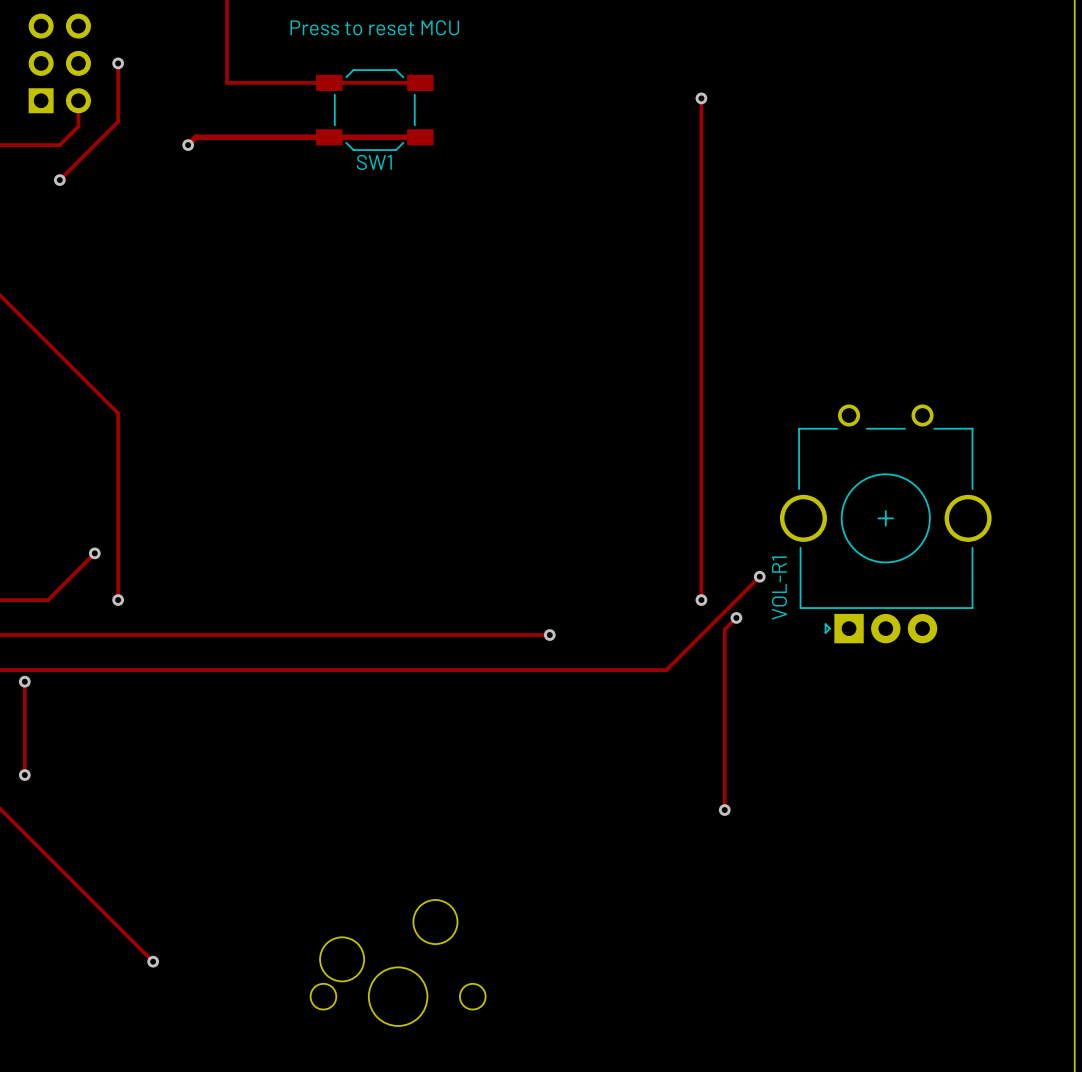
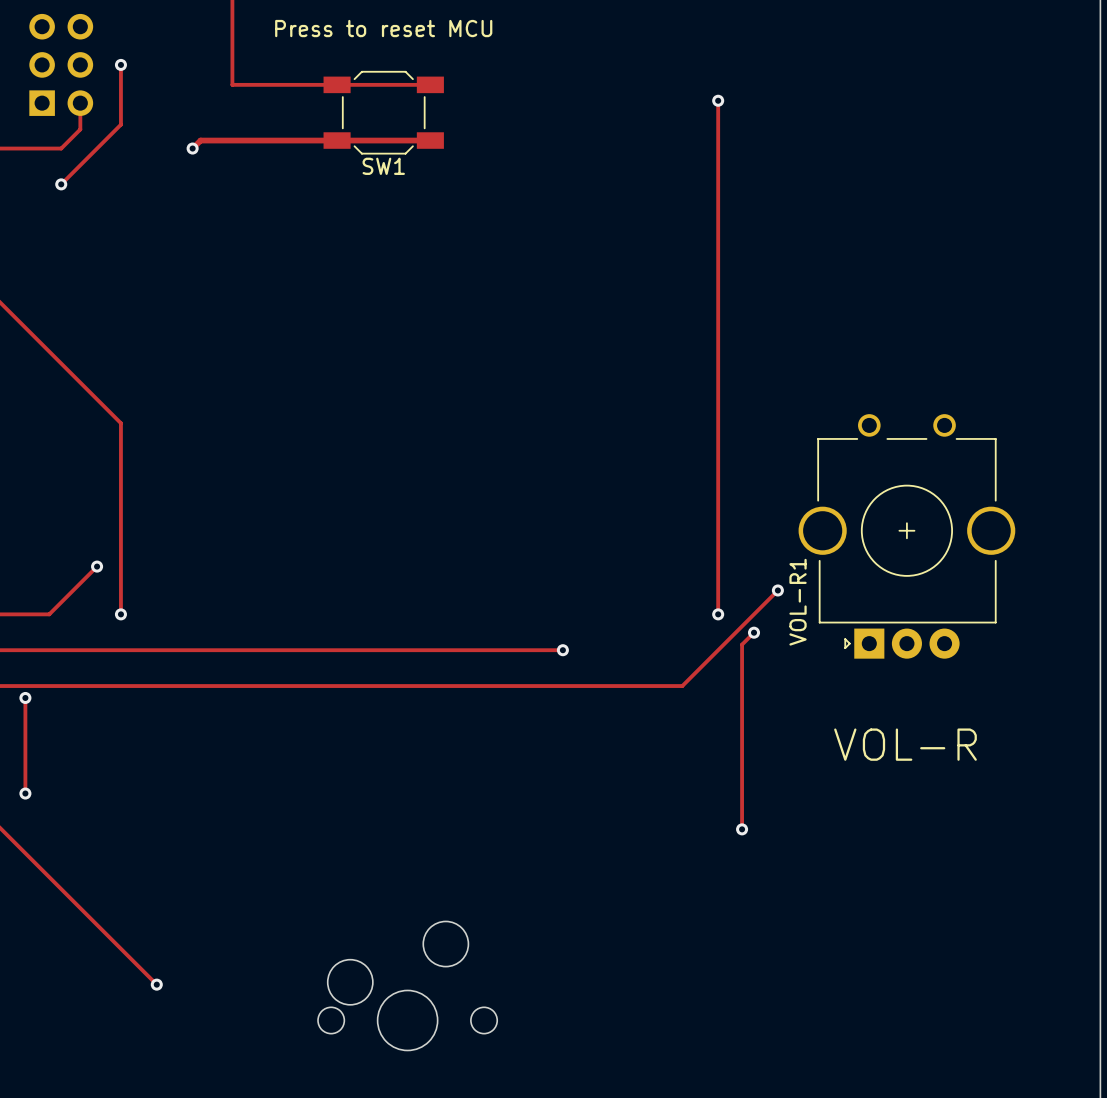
text: none -> VOL-R (905, 744)

